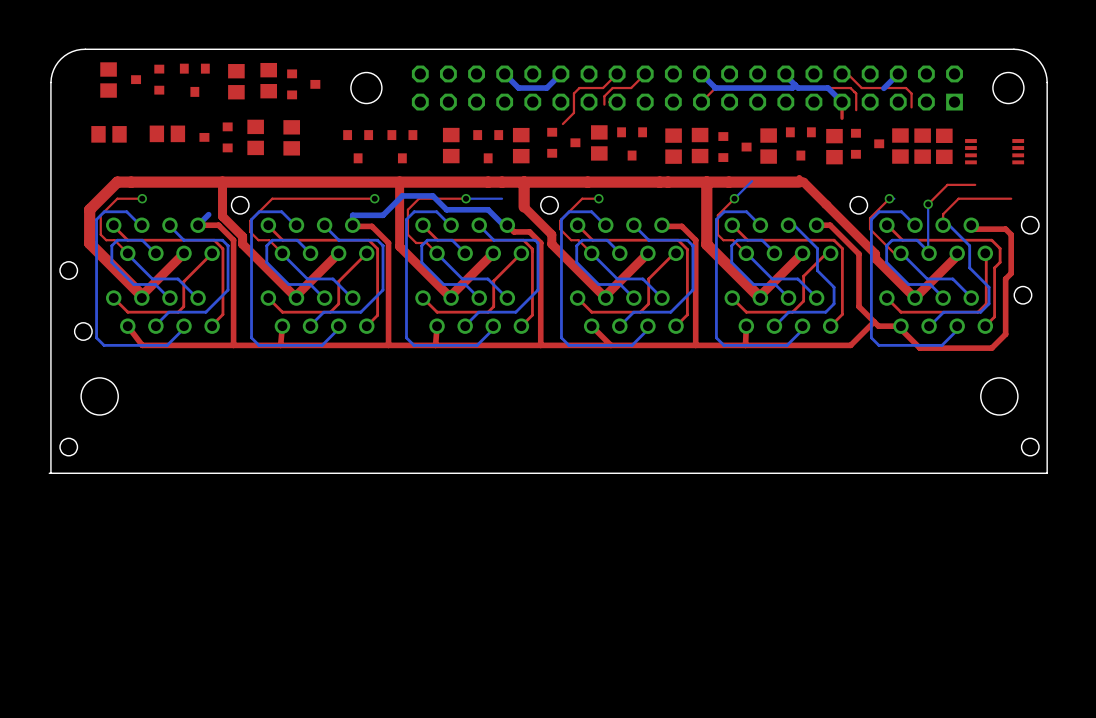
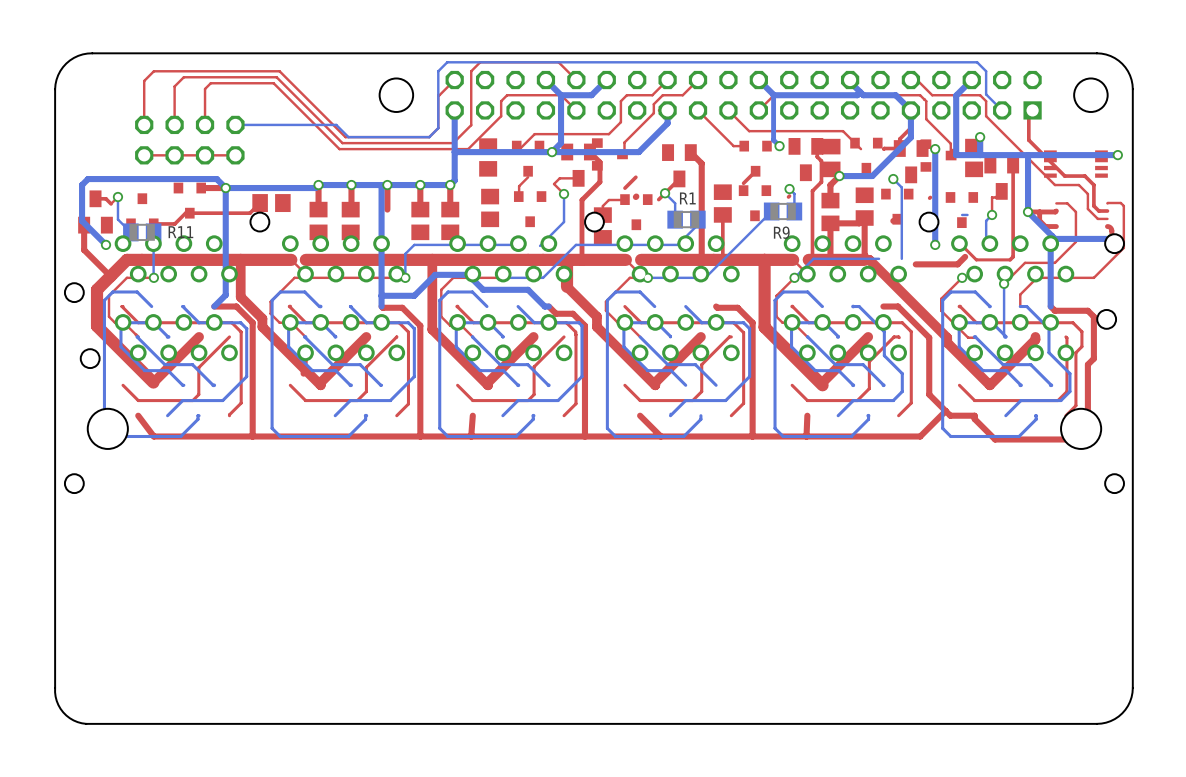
top track: none -> (454, 80) (438, 95) (438, 128) (429, 137) (345, 137) (279, 71) (153, 71) (144, 80) (144, 124)
top track: none -> (576, 80) (558, 62) (480, 62) (471, 71) (471, 125) (453, 143) (342, 143) (276, 77) (183, 77) (174, 86) (174, 124)
part: (147, 79) -> none
R11 side: top (108, 80) -> bottom (142, 232)
part: (194, 80) -> none
part: (268, 80) -> none
part: (236, 81) -> none
part: (303, 84) -> none
bottom track: none -> (773, 94) (773, 140) (779, 146)
bottom track: none -> (561, 95) (561, 143) (552, 152)
bottom track: none -> (956, 95) (956, 155) (1117, 155)
bottom track: none -> (454, 110) (454, 180) (450, 185) (318, 185) (315, 188) (225, 188)
top track: none -> (576, 110) (561, 95) (507, 95) (501, 101) (501, 116) (468, 149) (339, 149) (273, 83) (210, 83) (205, 89) (205, 124)
bottom track: none -> (667, 110) (667, 123) (638, 152) (454, 152)
top track: none -> (728, 110) (749, 131) (843, 131) (860, 149)
bottom track: none -> (910, 110) (910, 137) (872, 176) (839, 176)
bottom track: none -> (1002, 110) (986, 94) (986, 71) (977, 62) (447, 62) (438, 71) (438, 128) (429, 137) (348, 137) (336, 124) (235, 124)
top track: none -> (1032, 110) (1028, 114) (1028, 140) (1064, 176) (1084, 176) (1093, 185) (1093, 205) (1098, 211) (1107, 211)
top track: none -> (699, 111) (733, 146) (744, 146)
top track: none -> (653, 113) (624, 142) (624, 152)
top track: none -> (986, 116) (1054, 185) (1078, 185) (1087, 194) (1087, 208) (1097, 218) (1107, 218)
top track: none -> (926, 119) (950, 143) (950, 152) (953, 149)
top track: none -> (910, 127) (899, 139) (899, 148) (883, 149)
top track: none -> (608, 134) (534, 134) (516, 152)
part footprint: [149, 125, 186, 143] -> [135, 115, 245, 165]
bottom track: none -> (980, 137) (980, 155)
via: none -> (980, 137)
part footprint: [617, 127, 648, 161] -> [662, 144, 697, 188]
part footprint: [691, 127, 709, 164] -> [739, 140, 772, 177]
part footprint: [826, 128, 843, 165] -> [893, 140, 929, 184]
part footprint: [718, 132, 752, 162] -> [788, 138, 824, 182]
part: (109, 134) -> none
via: none -> (779, 146)
top track: none -> (817, 146) (817, 156) (821, 161) (821, 182) (812, 191) (812, 259)
part: (216, 137) -> none
part: (255, 137) -> none
part: (291, 137) -> none
bottom track: none -> (935, 149) (935, 244)
via: none -> (935, 149)
via: none -> (552, 152)
top track: none -> (589, 152) (599, 161) (599, 182) (581, 200) (581, 259)
top track: none -> (690, 152) (701, 163) (701, 259)
R9 side: top (599, 142) -> bottom (783, 211)
top track: none -> (235, 155) (144, 155)
bottom track: none -> (1028, 155) (1028, 211) (1054, 238) (1111, 238)
via: none -> (1117, 155)
part: (521, 145) -> none
part: (358, 146) -> none
part: (402, 146) -> none
part position: (673, 146) -> (722, 203)
part: (922, 146) -> none
part: (944, 146) -> none
part: none -> (578, 165)
top track: none -> (755, 171) (743, 183)
top track: none -> (839, 176) (830, 185) (830, 200)
via: none -> (839, 176)
top track: none -> (528, 177) (519, 186) (519, 196)
top track: none -> (635, 177) (624, 188)
top track: none -> (578, 178) (559, 178) (554, 184) (564, 194)
part: none -> (1001, 178)
top track: none -> (679, 178) (658, 199)
bottom track: none -> (893, 179) (901, 187) (901, 258)
via: none -> (893, 179)
top track: none -> (318, 185) (318, 209)
via: none -> (318, 185)
top track: none -> (351, 185) (350, 209)
via: none -> (351, 185)
top track: none -> (387, 185) (387, 209)
via: none -> (387, 185)
top track: none -> (420, 185) (420, 209)
via: none -> (420, 185)
top track: none -> (450, 185) (450, 209)
via: none -> (450, 185)
top track: none -> (225, 188) (201, 188)
bottom track: none -> (225, 188) (216, 179) (88, 179) (82, 185) (82, 220) (106, 244)
bottom track: none -> (225, 188) (225, 295) (214, 306)
via: none -> (225, 188)
bottom track: none -> (789, 189) (794, 193) (794, 211)
bottom track: none -> (665, 193) (675, 203) (675, 219)
bottom track: none -> (564, 194) (564, 222) (540, 245)
via: none -> (564, 194)
bottom track: (752, 181) (734, 198) -> none
top track: none -> (1001, 196) (1001, 191) (995, 197) (992, 197) (992, 214)
top track: none -> (117, 197) (111, 203) (105, 198) (95, 198)
bottom track: none -> (117, 197) (117, 219) (130, 232)
via: none -> (117, 197)
top track: (222, 182) (222, 216) (242, 236) (242, 244) (296, 298) (296, 295) (338, 253) -> (240, 259) (240, 297) (262, 318) (262, 326) (320, 385) (320, 382) (366, 336)
top track: (399, 182) (399, 240) -> (420, 373) (420, 436)
top track: (524, 182) (524, 207) (551, 234) (551, 244) (605, 298) (605, 295) (647, 253) -> (567, 259) (567, 286) (596, 316) (596, 326) (655, 385) (655, 382) (700, 336)
top track: (706, 182) (706, 240) -> (752, 373) (752, 436)
top track: none -> (930, 197) (929, 198)
top track: none -> (624, 200) (608, 200) (602, 206) (602, 215)
top track: (975, 184) (947, 184) (928, 204) -> none
part: none -> (189, 200)
top track: none -> (260, 203) (249, 213) (185, 213) (174, 223) (153, 223)
part: none -> (271, 203)
part: none -> (754, 203)
top track: none -> (1056, 203) (1067, 203) (1075, 211) (1075, 241) (1054, 262) (1025, 262) (1004, 283)
top track: none -> (1107, 203) (1120, 202) (1123, 205) (1123, 247) (1093, 277) (1037, 277) (1020, 294) (1020, 306)
part: none -> (864, 206)
part: none -> (897, 206)
part: none -> (490, 207)
part: none -> (530, 209)
part: none -> (961, 210)
part: none -> (95, 211)
part: none -> (142, 211)
bottom track: none -> (771, 211) (705, 277) (647, 277)
part: none -> (830, 211)
via: none -> (1028, 211)
top track: none -> (1039, 211) (1039, 220) (1045, 226) (1056, 226)
top track: none -> (1056, 211) (1028, 211)
part: none -> (636, 212)
top track: (142, 198) (117, 198) (100, 215) (100, 234) (106, 240) (114, 240) (127, 253) -> (153, 277) (126, 277) (109, 295) (109, 316) (114, 322) (124, 322) (138, 336)
via: (142, 198) -> none
top track: (374, 198) (272, 198) (250, 220) (250, 231) (258, 240) -> none
via: (374, 198) -> none
top track: (466, 198) (418, 198) (407, 209) (407, 234) (416, 242) (426, 242) (437, 253) -> (504, 277) (453, 277) (441, 289) (441, 316) (450, 325) (461, 325) (472, 336)
via: (466, 198) -> none
bottom track: (502, 198) (466, 198) -> none
top track: (598, 198) (582, 198) (560, 220) (560, 229) (571, 240) -> none
via position: (598, 198) -> (665, 193)
top track: (734, 198) (717, 215) (717, 234) (723, 240) -> (733, 259) (782, 259)
via position: (734, 198) -> (789, 189)
top track: (889, 198) (870, 218) (870, 229) (894, 254) (900, 253) -> (962, 277) (941, 298) (941, 310) (968, 337) (974, 336)
via: (889, 198) -> none
bottom track: none -> (992, 214) (986, 220) (986, 236)
via: none -> (992, 214)
top track: (1011, 198) (958, 198) (943, 214) (943, 225) -> none
top track: none -> (723, 215) (722, 259)
top track: none -> (864, 218) (859, 223) (830, 223) (830, 259)
top track: none -> (864, 218) (864, 255) (947, 337) (947, 342) (989, 385) (1035, 339) (1035, 336)
R1: none -> (686, 219)
bottom track: none -> (697, 219) (697, 224) (677, 244) (576, 244) (543, 277) (504, 277)
part: none -> (318, 220)
part: none -> (350, 221)
part: none -> (420, 220)
part: none -> (450, 220)
bottom track: (928, 204) (928, 252) (929, 253) (929, 252) (917, 240) (892, 240) (886, 245) (886, 262) (908, 284) (930, 284) (943, 298) -> (1004, 283) (1004, 335) (1005, 336) (1005, 336) (992, 322) (965, 322) (959, 328) (959, 346) (982, 370) (1006, 370) (1020, 385)
via: (928, 204) -> none
top track: none -> (84, 225) (84, 249) (110, 276)
part: none -> (602, 226)
top track: none -> (1107, 226) (1111, 229) (1111, 238)
bottom track: none -> (153, 232) (153, 277)
bottom track: (208, 214) (198, 225) -> none
bottom track: (352, 215) (383, 215) (402, 195) (432, 195) (446, 209) (488, 209) (503, 225) (507, 225) -> (381, 232) (381, 185)
bottom track: none -> (1051, 235) (1050, 306)
top track: (113, 225) (127, 240) -> (199, 336) (153, 382) (97, 326) (97, 289) (126, 259) (138, 259)
bottom track: (140, 225) (126, 211) (104, 211) (96, 219) (96, 277) -> (151, 306) (137, 291) (112, 291) (104, 300)
bottom track: (169, 225) (183, 240) (222, 240) (228, 245) (228, 290) (205, 312) (168, 312) (154, 326) -> (183, 306) (199, 322) (240, 322) (246, 328) (246, 376) (222, 400) (182, 400) (167, 415)
top track: (198, 225) (218, 225) (233, 240) (233, 298) -> (214, 306) (236, 306) (252, 322)
top track: (268, 225) (282, 240) -> none
bottom track: (296, 225) (281, 211) (259, 211) (251, 219) (251, 277) -> (320, 306) (304, 291) (280, 291) (272, 300)
bottom track: (324, 225) (338, 240) (377, 240) (383, 245) (383, 290) (360, 312) (323, 312) (309, 326) -> (351, 306) (366, 322) (408, 322) (414, 328) (414, 376) (390, 400) (350, 400) (335, 415)
top track: (352, 225) (371, 226) (388, 242) (388, 301) -> (381, 306) (402, 307) (420, 325)
bottom track: none -> (381, 243) (381, 306)
top track: (423, 225) (437, 240) -> (399, 259) (473, 259)
bottom track: (450, 225) (436, 211) (414, 211) (406, 219) (406, 277) -> (486, 306) (472, 291) (448, 291) (439, 300)
bottom track: (478, 225) (493, 240) (535, 240) (537, 242) (537, 290) (515, 312) (478, 312) (464, 326) -> (518, 306) (534, 322) (578, 322) (581, 325) (581, 376) (558, 400) (517, 400) (502, 415)
top track: (507, 225) (514, 231) (529, 231) (540, 242) (540, 301) -> (548, 306) (556, 313) (573, 313) (584, 325)
top track: (577, 225) (592, 240) -> none
bottom track: (605, 225) (591, 211) (569, 211) (561, 219) (561, 277) -> (655, 306) (640, 291) (615, 291) (607, 300)
bottom track: (633, 225) (648, 240) (687, 240) (692, 245) (692, 290) (670, 312) (633, 312) (619, 326) (619, 324) -> (685, 306) (701, 322) (743, 322) (749, 328) (749, 376) (725, 400) (685, 400) (670, 415) (670, 413)
top track: (661, 225) (681, 226) (695, 240) (695, 298) -> (716, 306) (737, 307) (752, 322)
top track: (732, 225) (747, 240) -> none
bottom track: (760, 225) (746, 211) (724, 211) (716, 219) (716, 277) -> (822, 306) (807, 291) (783, 291) (775, 300)
bottom track: (788, 225) (794, 225) (817, 248) (817, 270) (834, 287) (834, 303) (825, 312) (788, 312) (774, 326) -> (852, 306) (859, 306) (884, 331) (884, 355) (902, 373) (902, 391) (893, 400) (853, 400) (838, 415)
bottom track: (915, 225) (901, 211) (879, 211) (871, 219) (871, 277) -> (990, 306) (975, 291) (951, 291) (942, 300)
bottom track: (943, 225) (949, 225) (969, 245) (969, 267) (989, 287) (989, 303) (980, 312) (943, 312) (929, 326) -> (1020, 306) (1026, 306) (1048, 328) (1048, 352) (1069, 373) (1069, 391) (1060, 400) (1020, 400) (1005, 415)
top track: (971, 225) (975, 229) (1005, 229) (1011, 234) (1011, 273) (1005, 278) (1005, 334) (991, 348) (919, 348) (900, 329) (900, 326) (878, 326) (858, 306) (858, 254) (830, 225) (816, 225) -> (1050, 306) (1054, 310) (1087, 310) (1093, 316) (1093, 358) (1087, 364) (1087, 424) (1072, 439) (995, 439) (974, 419) (974, 415) (950, 415) (929, 394) (929, 337) (898, 306) (883, 306)
via: none -> (106, 244)
via: none -> (935, 244)
bottom track: none -> (517, 245) (414, 244) (405, 253) (405, 277)
top track: none -> (965, 256) (957, 264) (915, 264)
bottom track: none -> (879, 258) (813, 258) (794, 277)
top track: (214, 240) (222, 248) (222, 306) -> (231, 259) (279, 259)
top track width: thin (214, 240) (127, 240) -> thick (231, 259) (138, 259)
top track width: thin (269, 240) (258, 240) -> thick (291, 259) (279, 259)
top track: (368, 240) (377, 248) (377, 306) -> (290, 306) (305, 322) (399, 322) (408, 332)
top track width: thin (368, 240) (282, 240) -> thick (399, 259) (305, 259)
top track: (523, 240) (532, 248) (532, 309) -> (566, 259) (617, 259)
top track width: thin (523, 240) (437, 240) -> thick (566, 259) (473, 259)
top track width: thin (578, 240) (571, 240) -> thick (625, 259) (617, 259)
top track: (678, 240) (687, 249) (687, 307) -> (624, 306) (641, 322) (733, 322) (743, 332)
top track width: thin (678, 240) (592, 240) -> thick (733, 259) (641, 259)
top track width: thin (733, 240) (723, 240) -> thick (793, 259) (782, 259)
top track: (803, 240) (834, 240) (842, 248) (842, 306) -> (792, 306) (808, 322) (902, 322) (911, 331)
top track width: thin (803, 240) (747, 240) -> thick (869, 259) (808, 259)
top track: (933, 240) (991, 240) (1000, 248) (1000, 262) (994, 267) (994, 316) (985, 326) -> (1010, 259) (1013, 256) (1013, 165)
top track: (706, 244) (760, 298) (760, 295) (802, 253) -> (764, 264) (764, 327) (822, 385) (822, 382) (868, 336)
top track: (399, 246) (451, 298) (451, 295) (493, 253) -> (432, 266) (432, 329) (488, 385) (488, 382) (533, 336)
bottom track: (127, 253) (152, 278) (177, 278) (198, 298) -> (138, 336) (164, 364) (192, 364) (214, 385)
bottom track: (155, 253) (142, 240) (117, 240) (111, 245) (111, 262) (133, 284) (155, 284) (169, 298) -> (168, 336) (153, 322) (126, 322) (120, 328) (120, 346) (144, 370) (168, 370) (183, 385)
top track: (212, 253) (183, 281) (183, 306) (178, 312) (127, 312) (113, 298) -> (229, 336) (198, 367) (198, 394) (192, 400) (138, 400) (123, 385)
bottom track: (282, 253) (307, 278) (332, 278) (352, 298) -> (305, 336) (332, 364) (360, 364) (381, 385)
bottom track: (310, 253) (297, 240) (272, 240) (266, 245) (266, 262) (288, 284) (310, 284) (324, 298) -> (335, 336) (321, 322) (294, 322) (288, 328) (288, 346) (312, 370) (335, 370) (351, 385)
top track: (366, 253) (338, 281) (338, 303) (330, 312) (282, 312) (268, 298) -> (396, 336) (366, 367) (366, 391) (357, 400) (305, 400) (290, 385)
bottom track: (437, 253) (462, 278) (487, 278) (507, 298) -> (472, 336) (500, 364) (527, 364) (548, 385)
bottom track: (465, 253) (452, 240) (427, 240) (421, 245) (421, 262) (443, 284) (465, 284) (479, 298) -> (503, 336) (489, 322) (462, 322) (456, 328) (456, 346) (480, 370) (503, 370) (518, 385)
top track: (521, 253) (493, 281) (493, 306) (488, 312) (437, 312) (423, 298) -> (564, 336) (534, 366) (534, 394) (528, 400) (472, 400) (457, 385)
bottom track: (591, 253) (617, 278) (642, 278) (661, 298) -> (640, 336) (667, 364) (695, 364) (716, 385)
bottom track: (619, 253) (607, 240) (582, 240) (576, 245) (576, 262) (598, 284) (620, 284) (633, 298) -> (670, 336) (656, 322) (629, 322) (623, 328) (623, 346) (647, 370) (671, 370) (685, 385)
top track: (676, 253) (648, 278) (648, 303) (640, 312) (591, 312) (577, 298) -> (731, 336) (701, 364) (701, 391) (692, 400) (640, 400) (624, 385)
bottom track: (746, 253) (772, 278) (797, 278) (816, 298) -> (807, 336) (835, 364) (863, 364) (883, 385)
bottom track: (774, 253) (762, 240) (737, 240) (731, 245) (731, 262) (753, 284) (775, 284) (788, 298) -> (837, 336) (824, 322) (797, 322) (791, 328) (791, 346) (815, 370) (838, 370) (852, 385)
top track: (831, 253) (826, 253) (803, 276) (803, 301) (792, 312) (746, 312) (732, 298) -> (899, 337) (894, 336) (869, 361) (869, 388) (857, 400) (807, 400) (792, 385)
bottom track: (900, 253) (927, 278) (952, 278) (971, 298) -> (974, 336) (1003, 364) (1030, 364) (1050, 385)
top track: (957, 253) (957, 255) (915, 298) (875, 258) (875, 254) (803, 182) (117, 182) (89, 209) (89, 243) (141, 295) (184, 253) -> none
top track: (985, 253) (986, 303) (977, 312) (901, 312) (886, 298) -> (1065, 336) (1066, 391) (1057, 400) (974, 400) (959, 385)
via: none -> (153, 277)
top track: none -> (405, 277) (294, 277) (270, 301) (270, 313) (279, 322) (291, 322) (305, 336)
via: none -> (405, 277)
top track: none -> (647, 277) (629, 277) (605, 301) (605, 310) (617, 322) (625, 322) (640, 336)
via: none -> (647, 277)
top track: none -> (794, 277) (776, 295) (776, 316) (782, 322) (793, 322) (807, 336)
via: none -> (794, 277)
via: none -> (962, 277)
via: none -> (1004, 283)
bottom track: none -> (381, 295) (414, 295) (435, 274) (468, 274) (483, 289) (528, 289) (544, 306) (548, 306)
top track: none -> (123, 306) (138, 322) (231, 322) (241, 332)
top track: none -> (457, 306) (473, 322) (566, 322) (576, 334)
top track: none -> (959, 306) (976, 322) (1072, 322) (1081, 331) (1081, 346) (1075, 352) (1075, 405) (1065, 415)
top track: (222, 314) (212, 326) -> (241, 340) (241, 403) (229, 415)
top track: (687, 314) (676, 326) -> (743, 340) (743, 403) (731, 415)
top track: (842, 314) (830, 326) -> (911, 340) (911, 403) (898, 415)
top track: (377, 315) (366, 326) -> (408, 341) (408, 404) (396, 415)
top track: (532, 315) (521, 326) -> (576, 340) (576, 403) (564, 415)
top track: (874, 321) (850, 345) (142, 345) (127, 326) -> (945, 411) (920, 436) (153, 436) (138, 415)
bottom track: (184, 326) (167, 345) (104, 345) (96, 337) -> (199, 415) (197, 419) (180, 436) (112, 436) (104, 428) (104, 365)
bottom track: (338, 326) (337, 329) (322, 345) (259, 345) (251, 337) -> (366, 415) (365, 419) (348, 436) (280, 436) (272, 428) (272, 365)
top track: (437, 326) (435, 345) -> (472, 415) (471, 436)
bottom track: (493, 326) (492, 329) (477, 345) (414, 345) (406, 337) -> (533, 415) (533, 419) (516, 436) (447, 436) (439, 428) (439, 365)
top track: (591, 326) (610, 345) -> (640, 415) (660, 436)
bottom track: (647, 326) (647, 329) (632, 345) (568, 345) (561, 337) -> (700, 415) (700, 419) (683, 436) (615, 436) (607, 428) (607, 365)
top track: (746, 326) (745, 345) -> (807, 415) (806, 436)
bottom track: (802, 326) (802, 329) (787, 345) (723, 345) (716, 337) -> (868, 415) (868, 419) (851, 436) (783, 436) (775, 428) (775, 365)
bottom track: (957, 326) (957, 329) (942, 345) (878, 345) (871, 337) -> (1035, 415) (1036, 419) (1019, 436) (950, 436) (942, 428) (942, 365)
top track: none -> (252, 373) (252, 436)
top track: none -> (584, 373) (584, 436)
board edge: (1047, 473) (49, 473) -> (1132, 511) (1132, 692) (1128, 705) (1118, 716) (1106, 722) (1096, 723) (81, 723) (69, 718) (63, 712) (55, 696) (55, 511)

